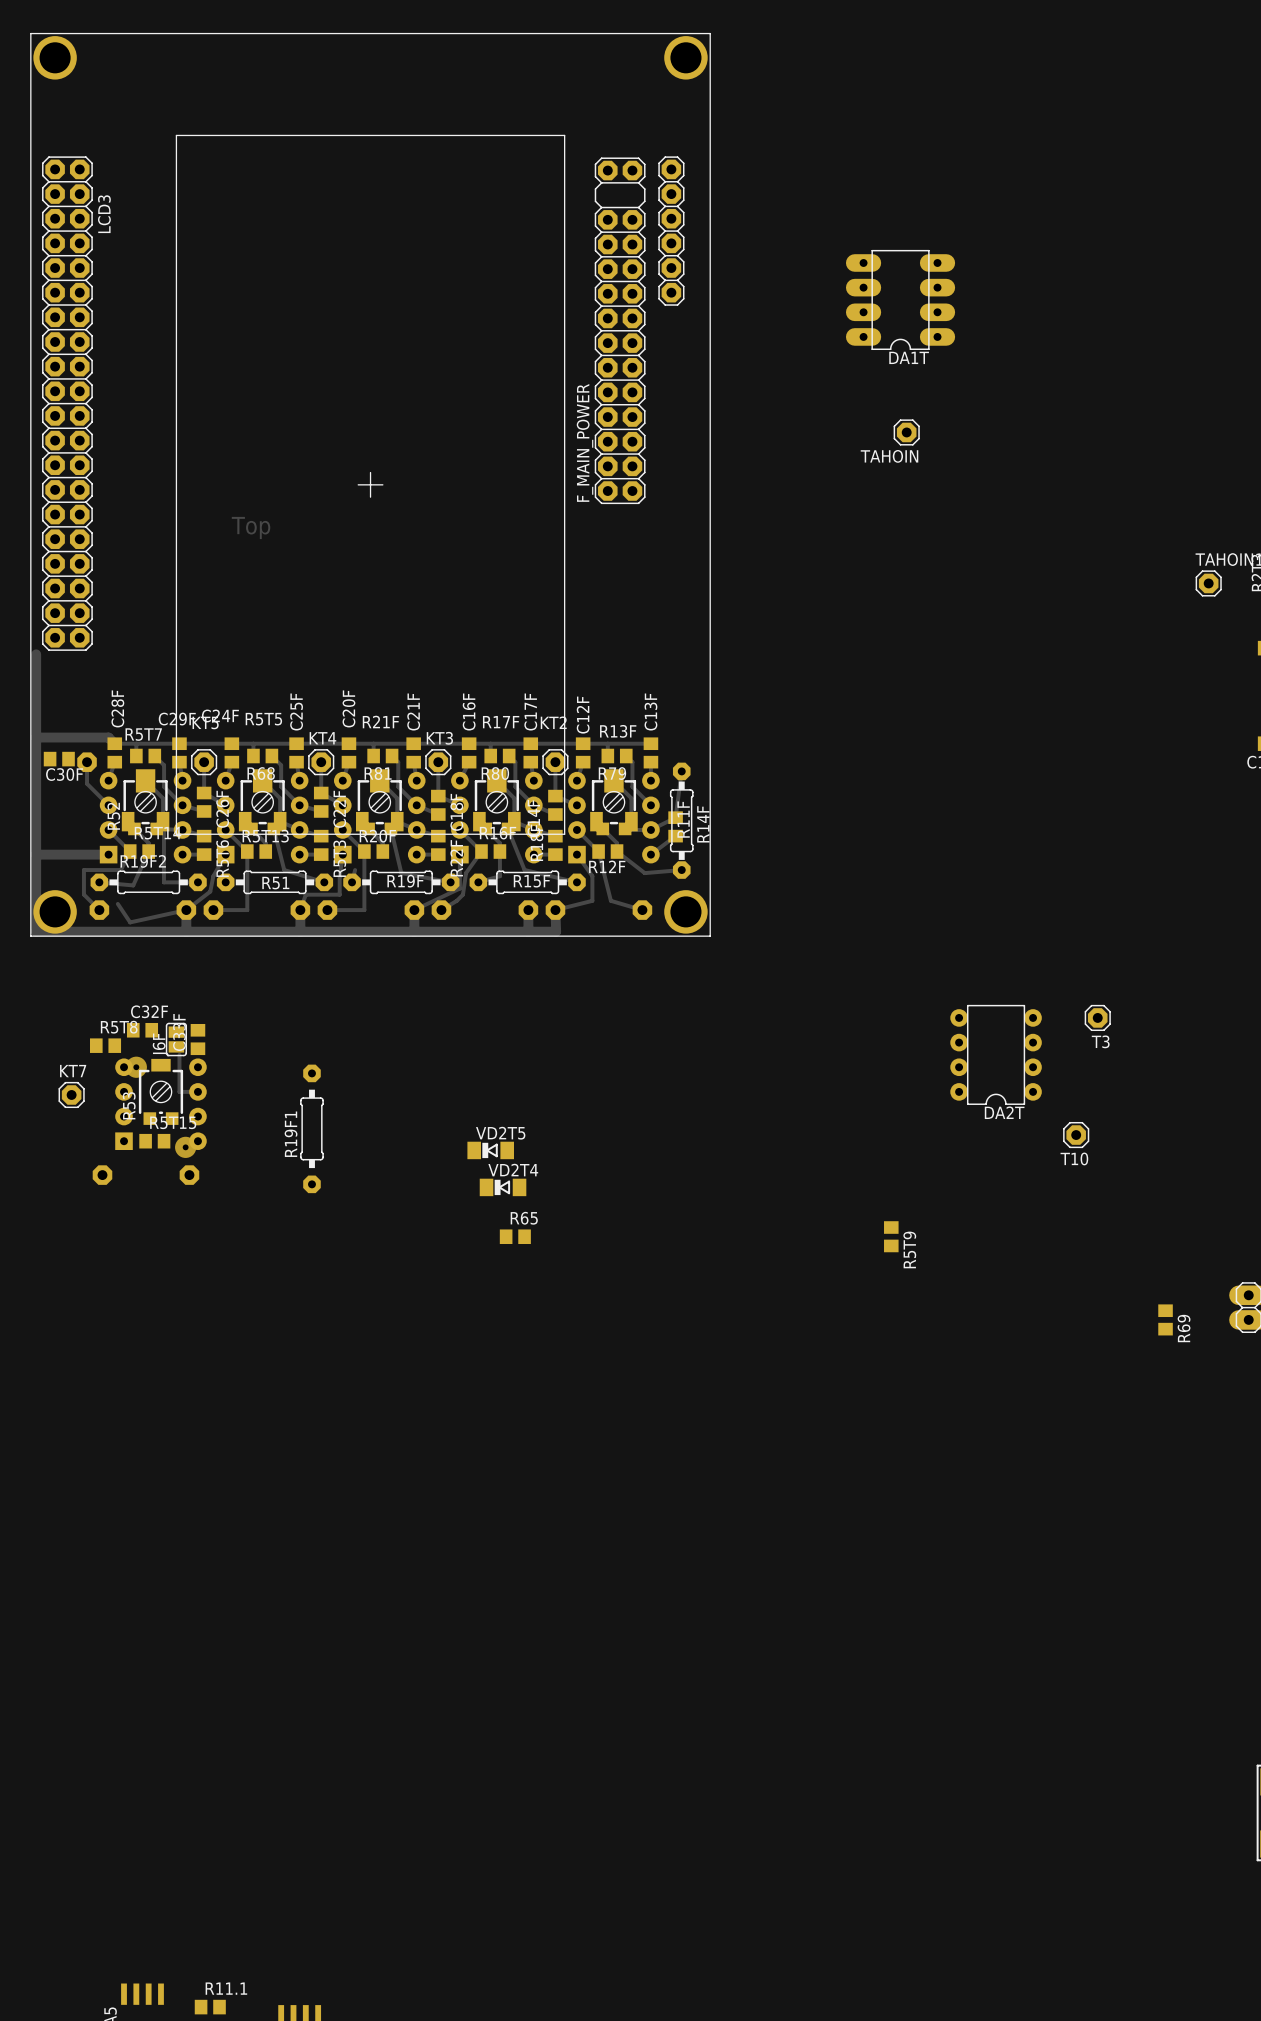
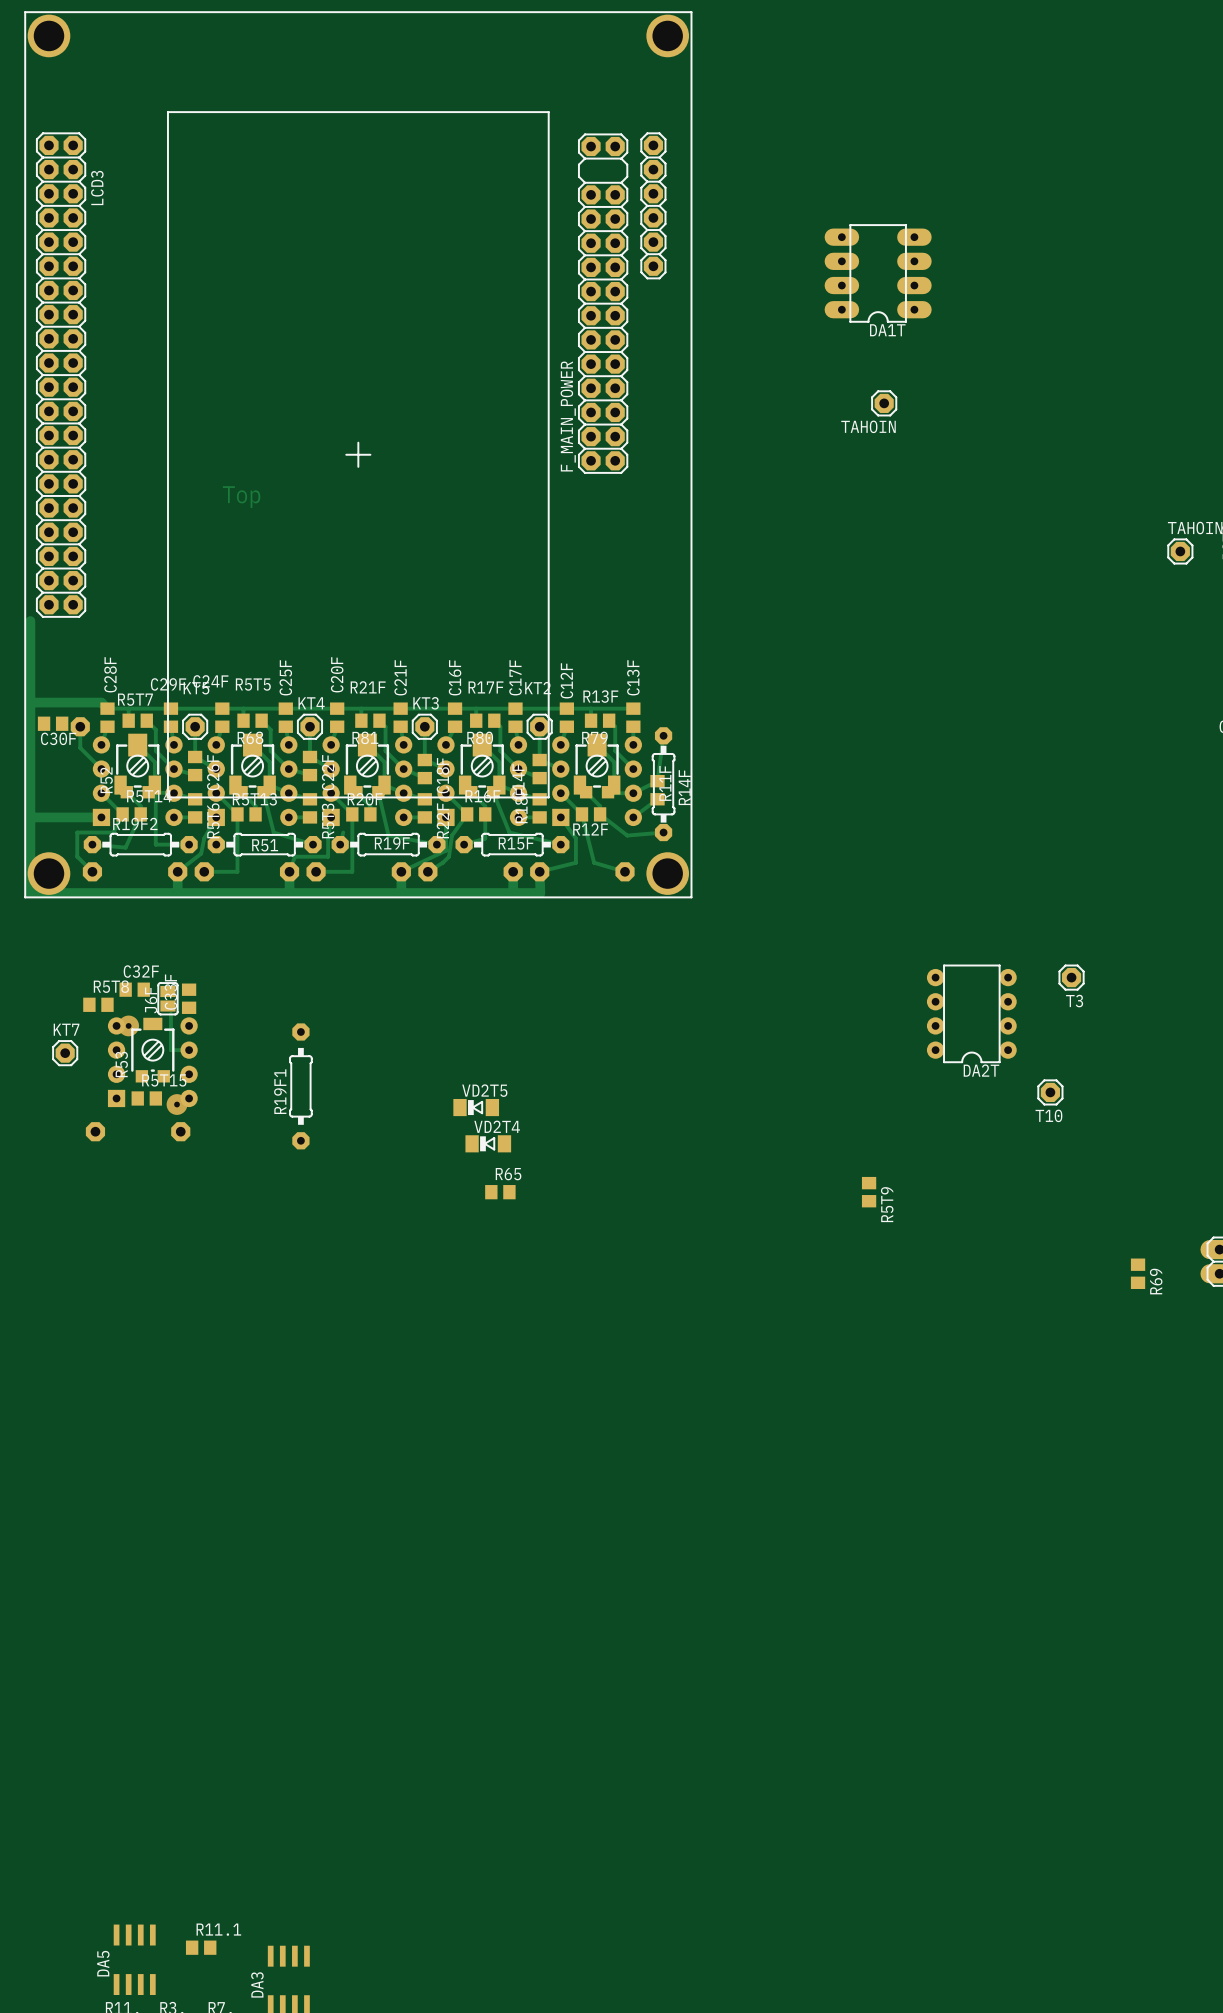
track: (117, 903) (130, 922) (186, 910) -> none

